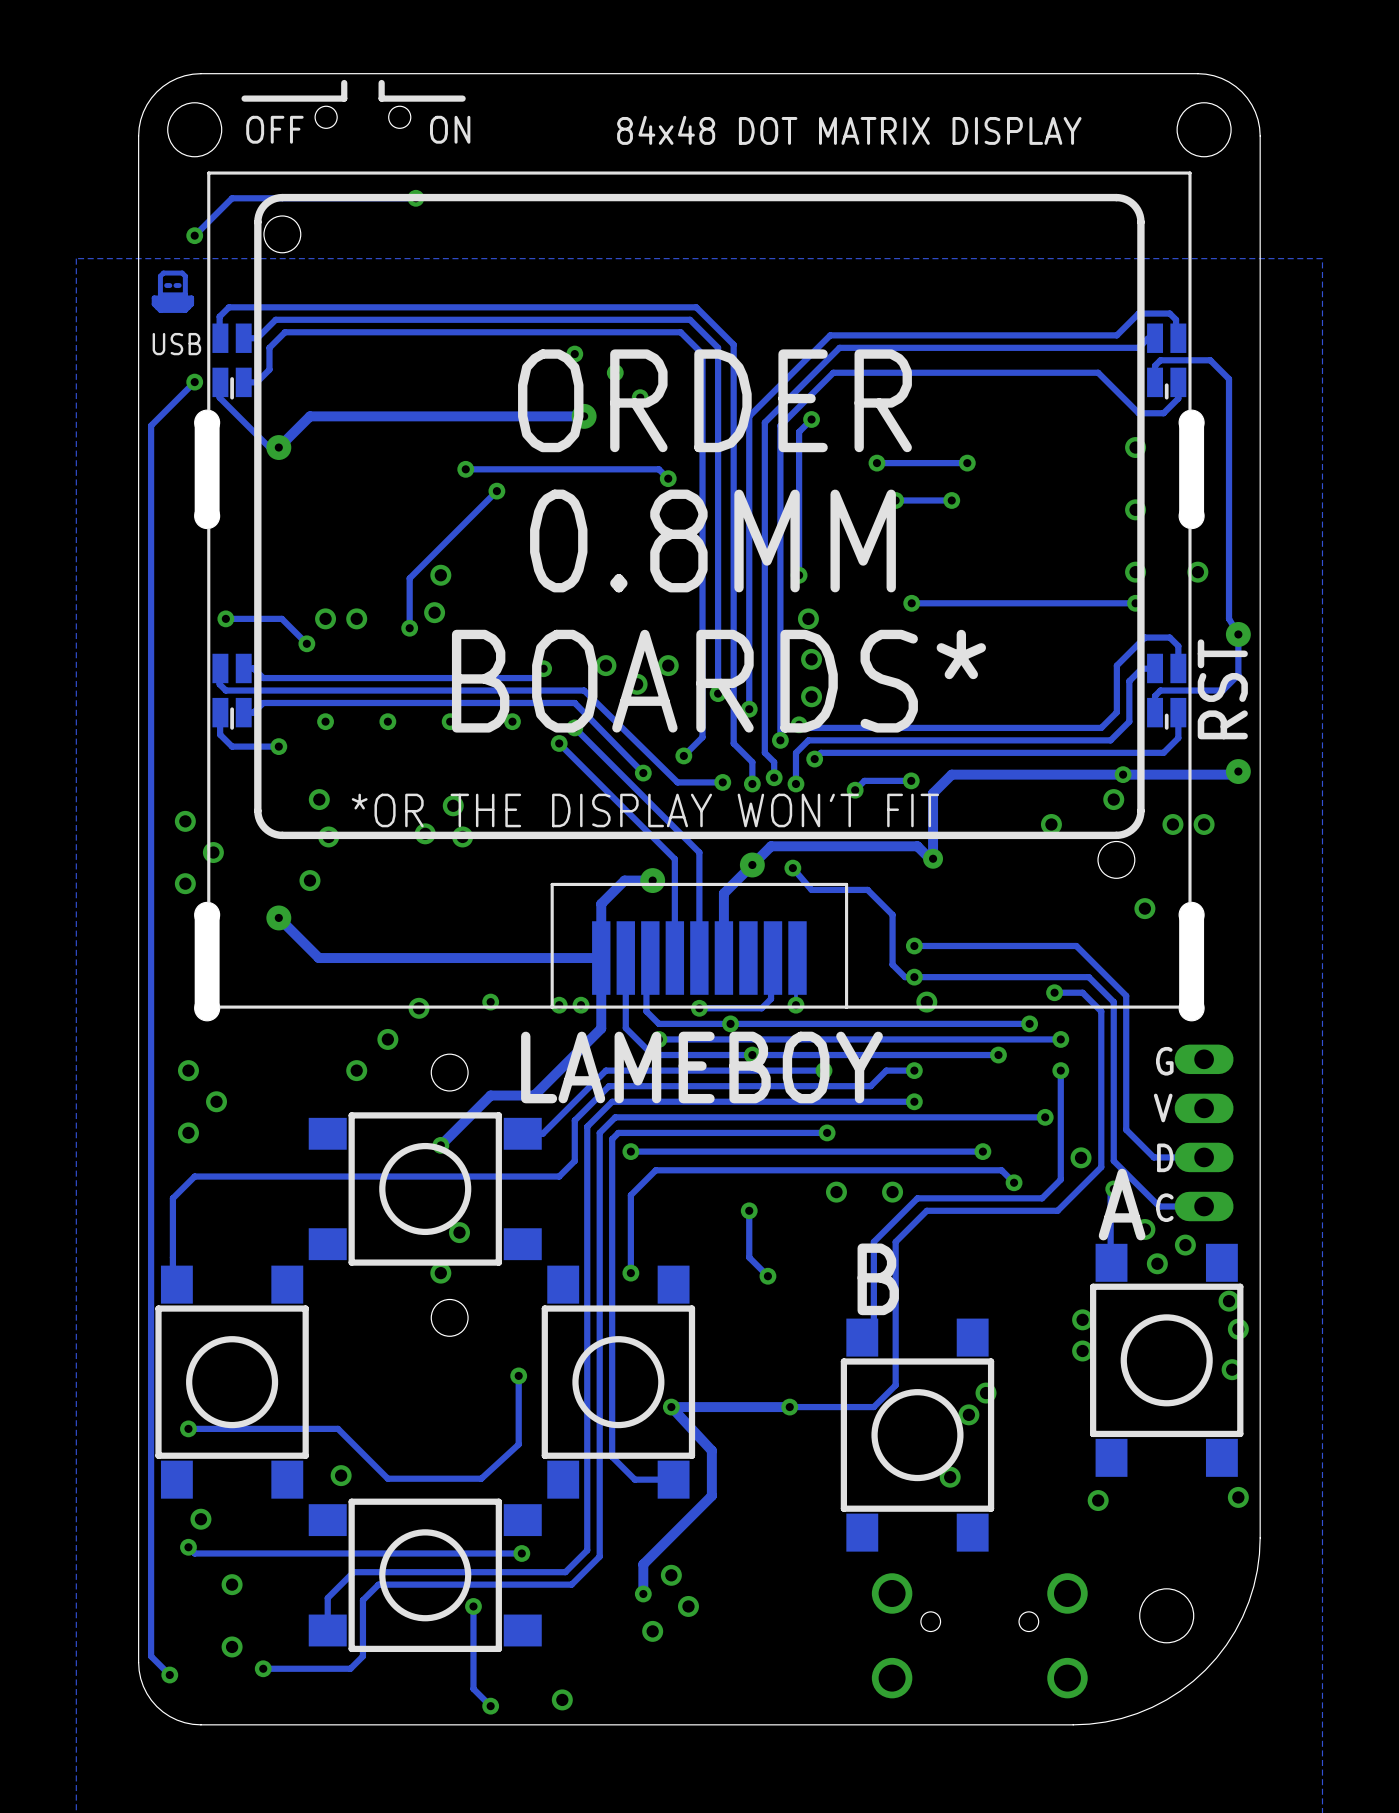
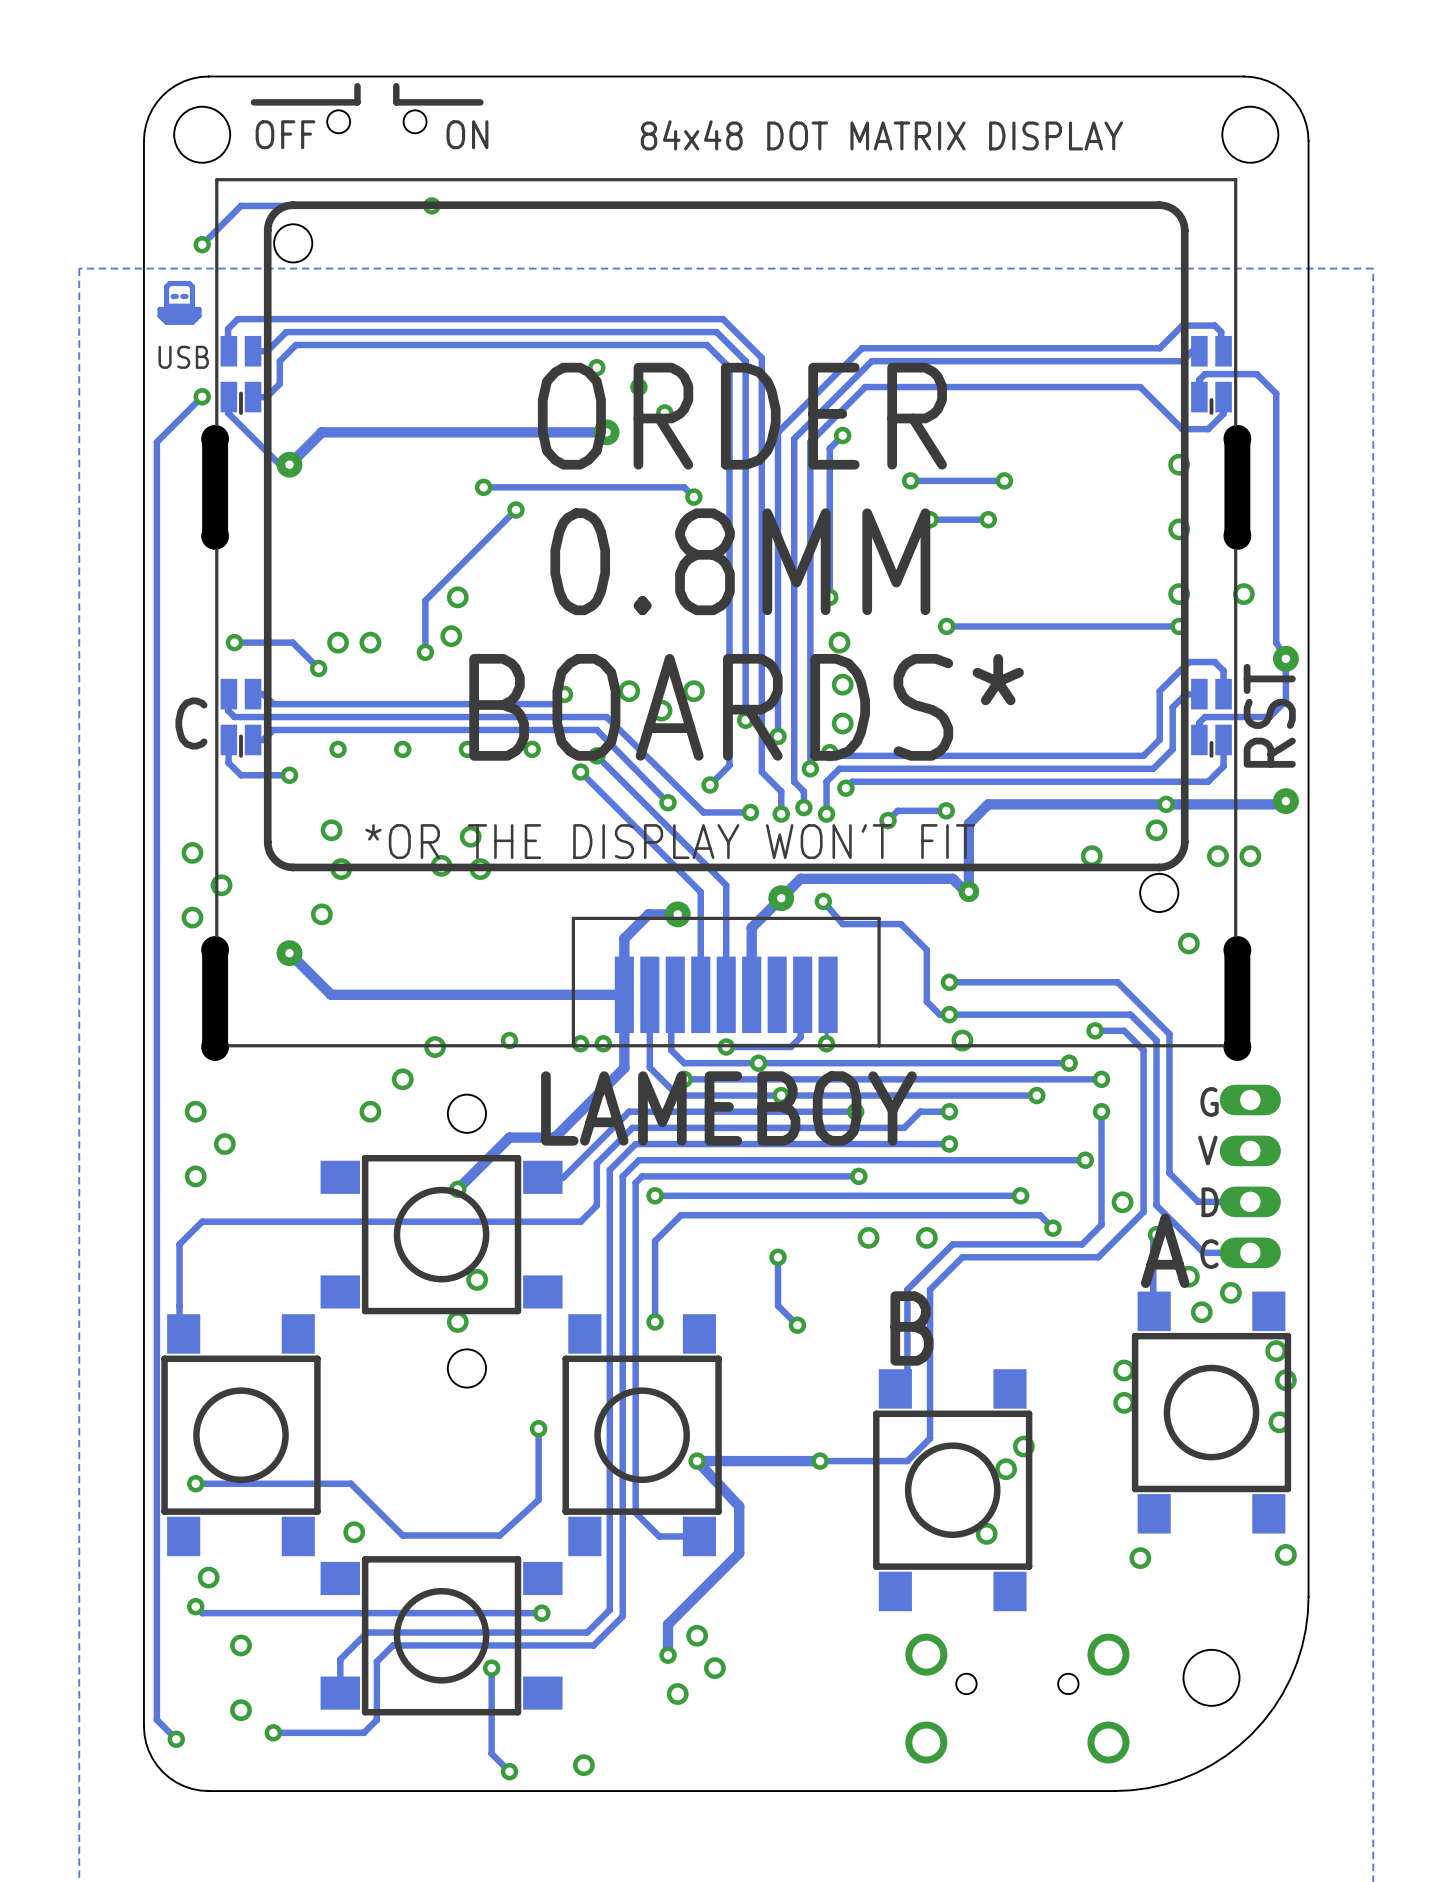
text: none -> C (191, 723)

